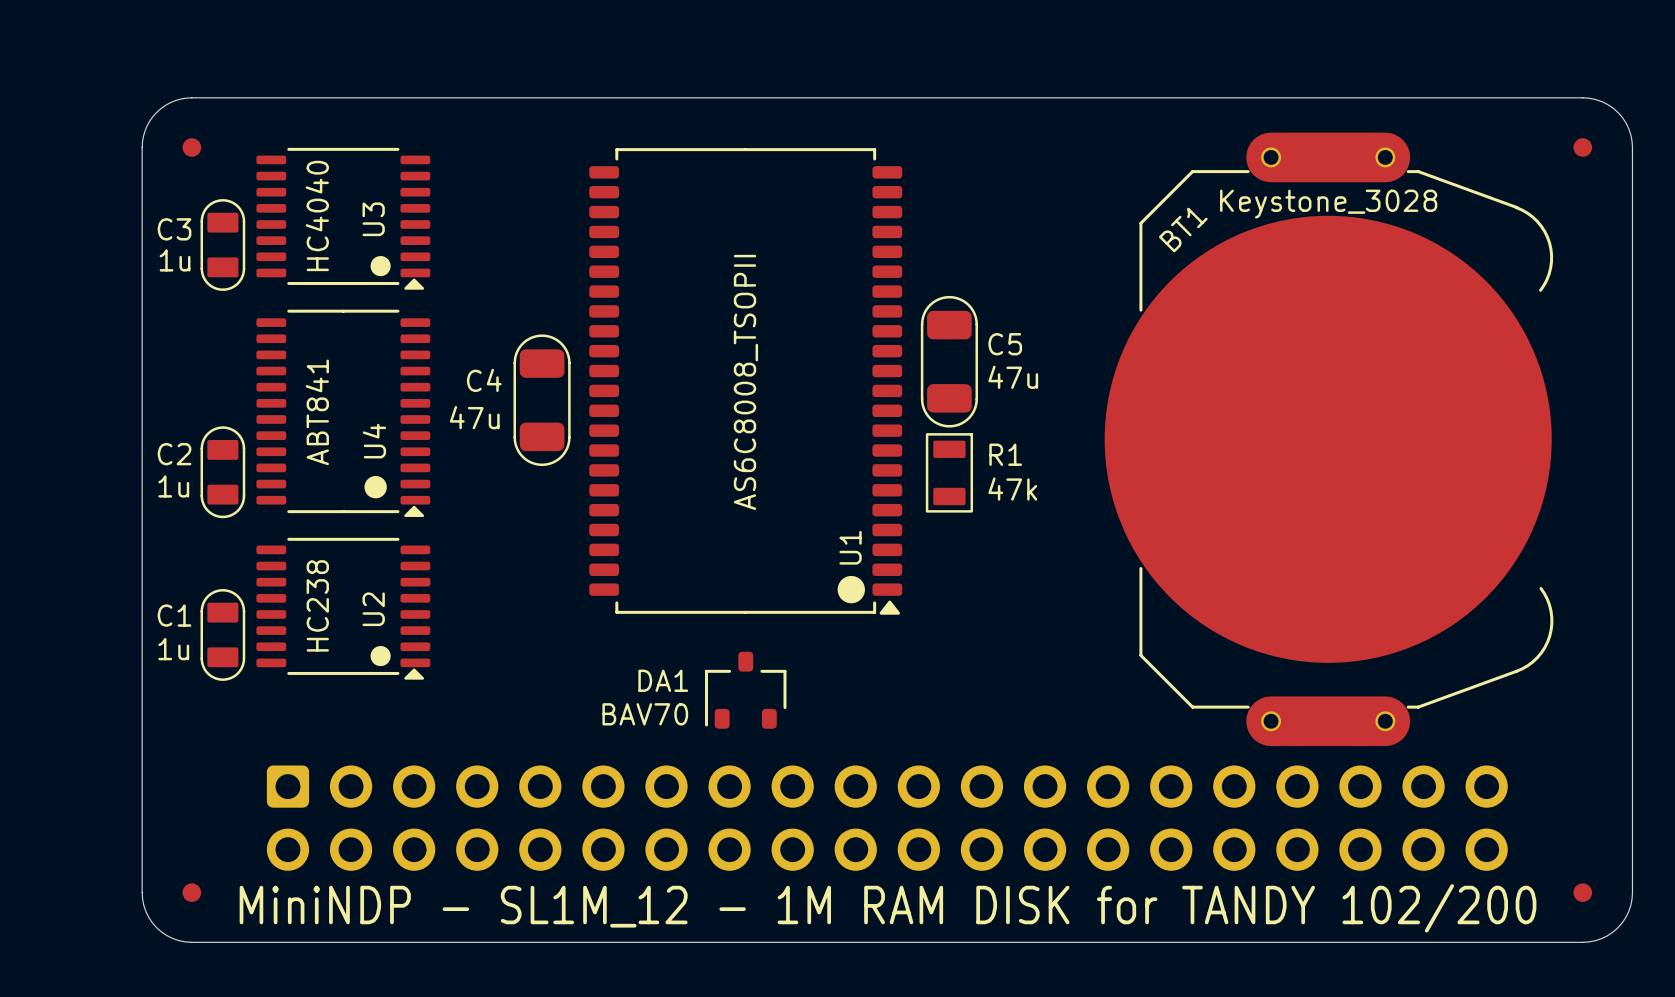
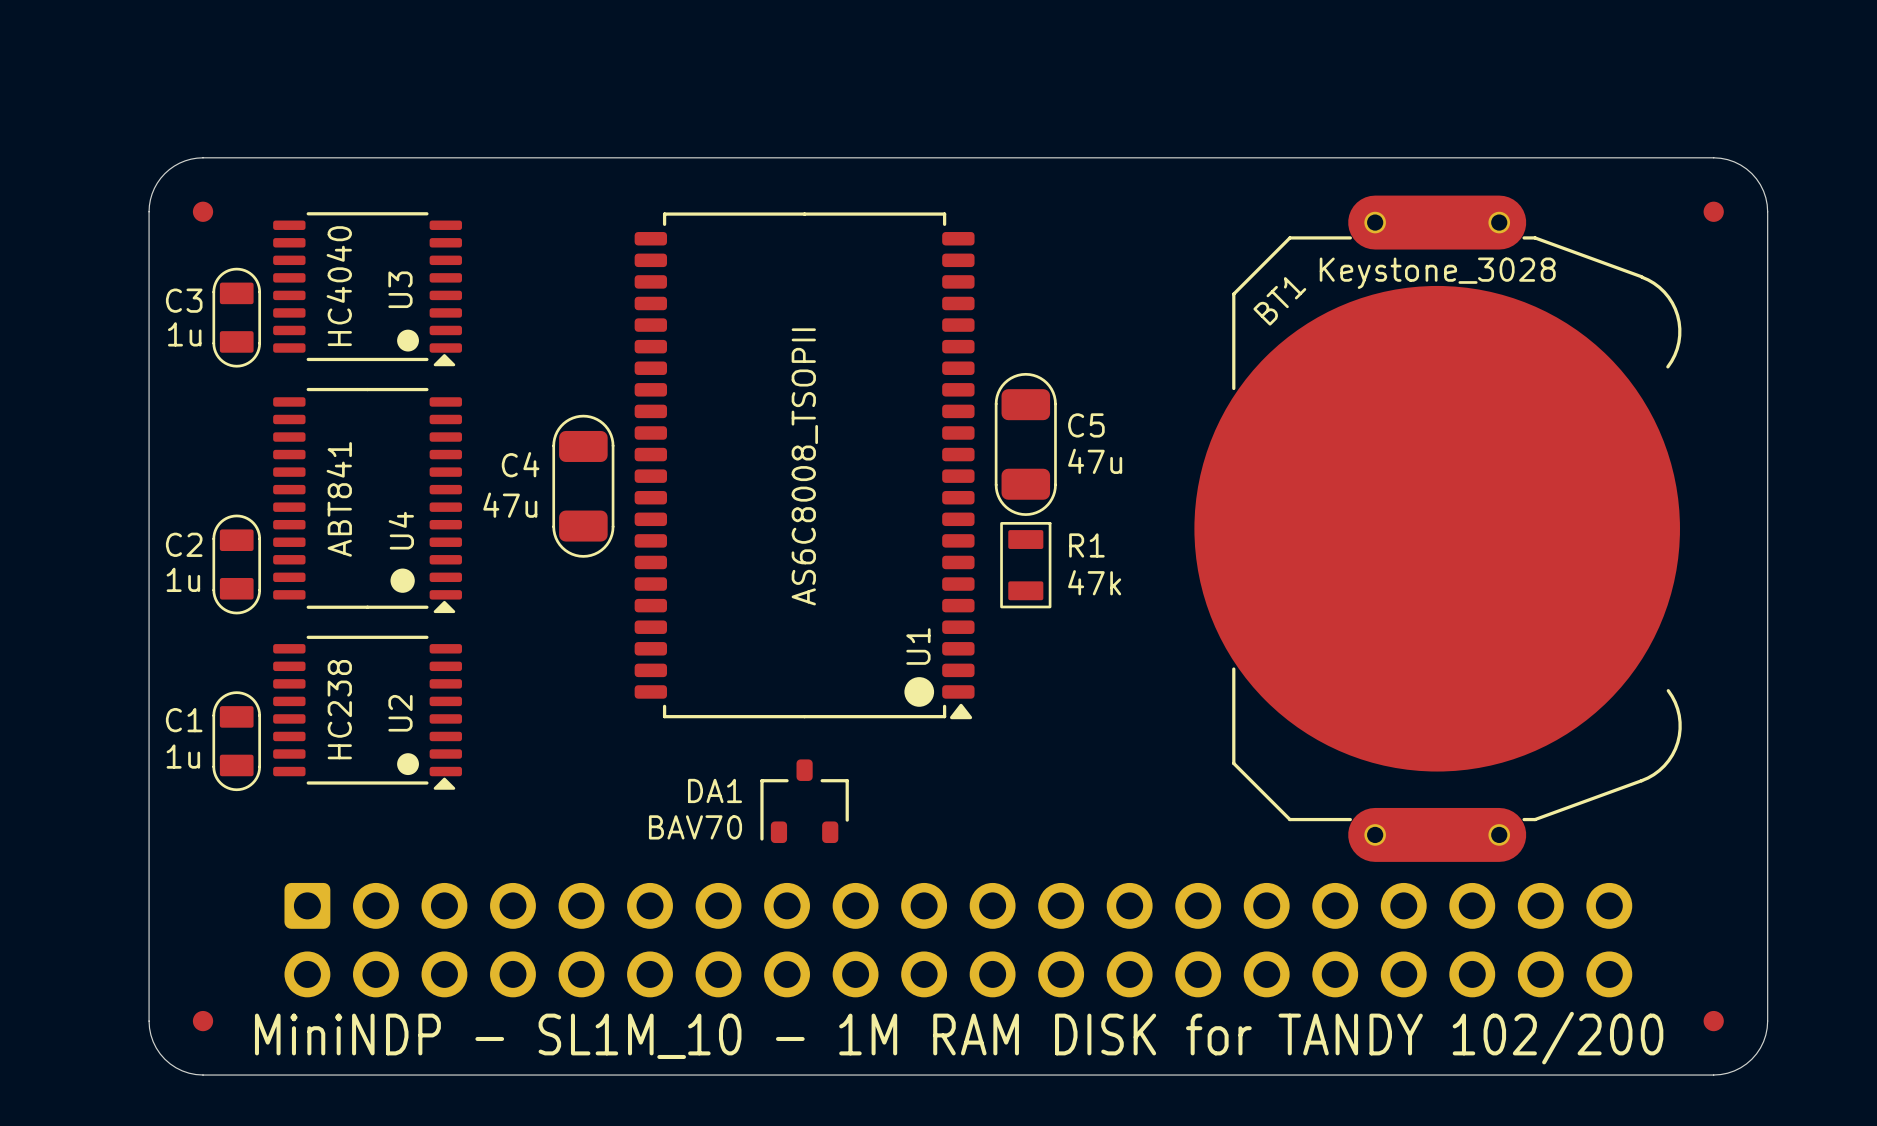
text: MiniNDP - SL1M_12 - 1M RAM DISK for TANDY 102/200 (888, 908) -> MiniNDP - SL1M_10 - 1M RAM DISK for TANDY 102/200 (959, 1038)

